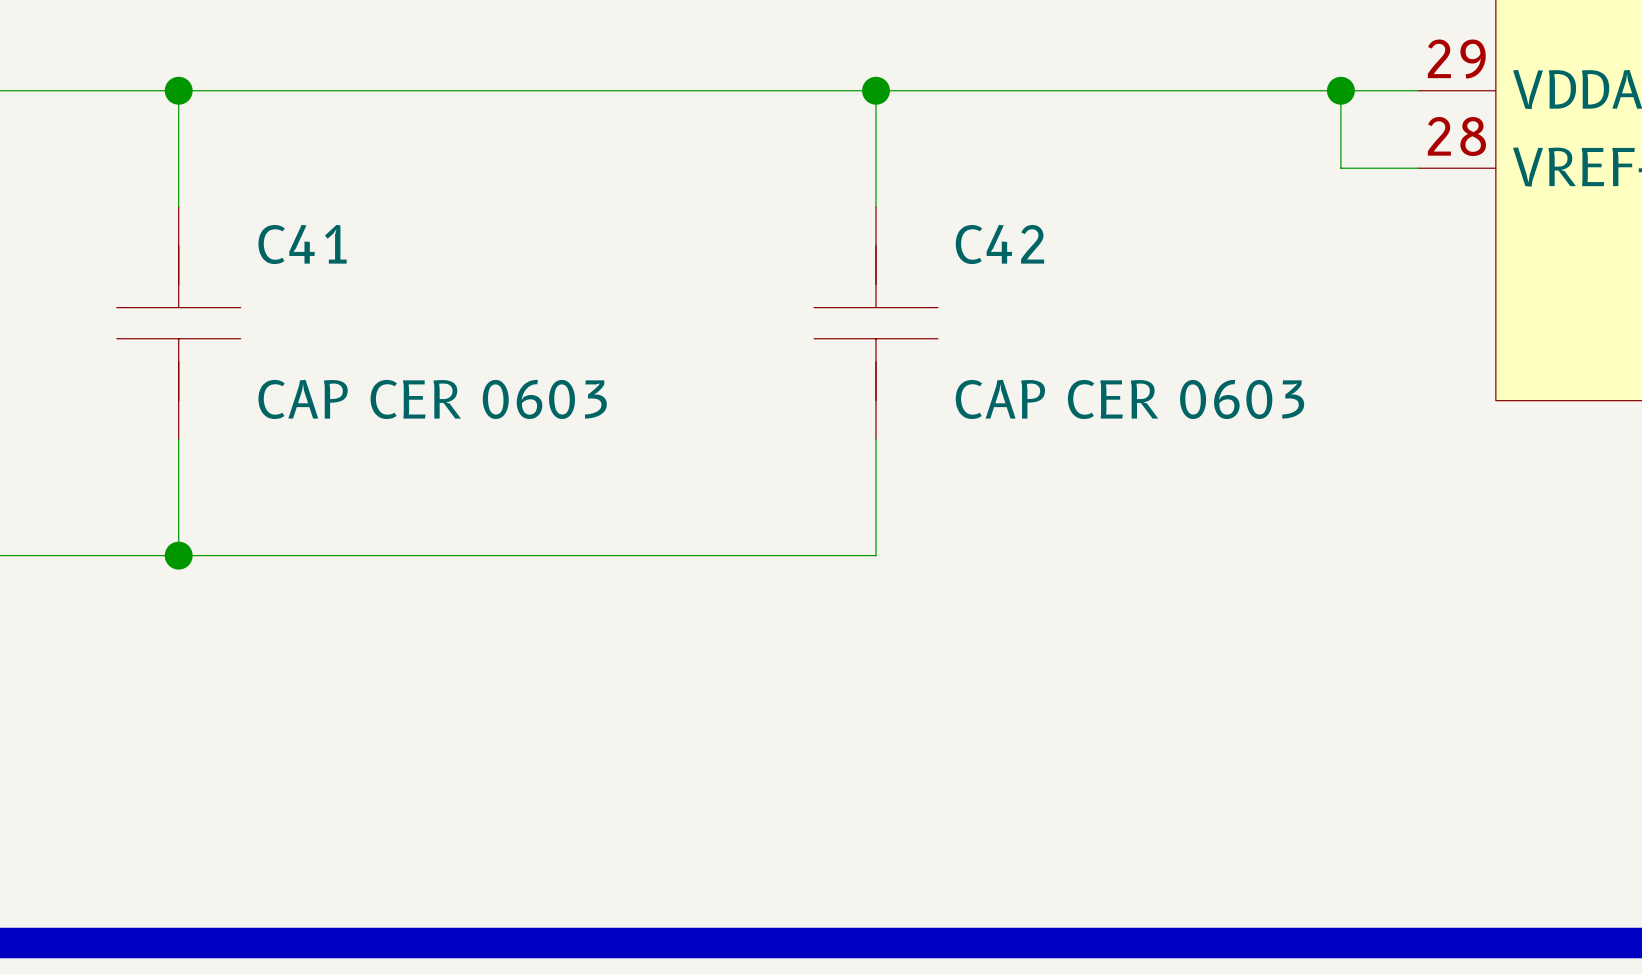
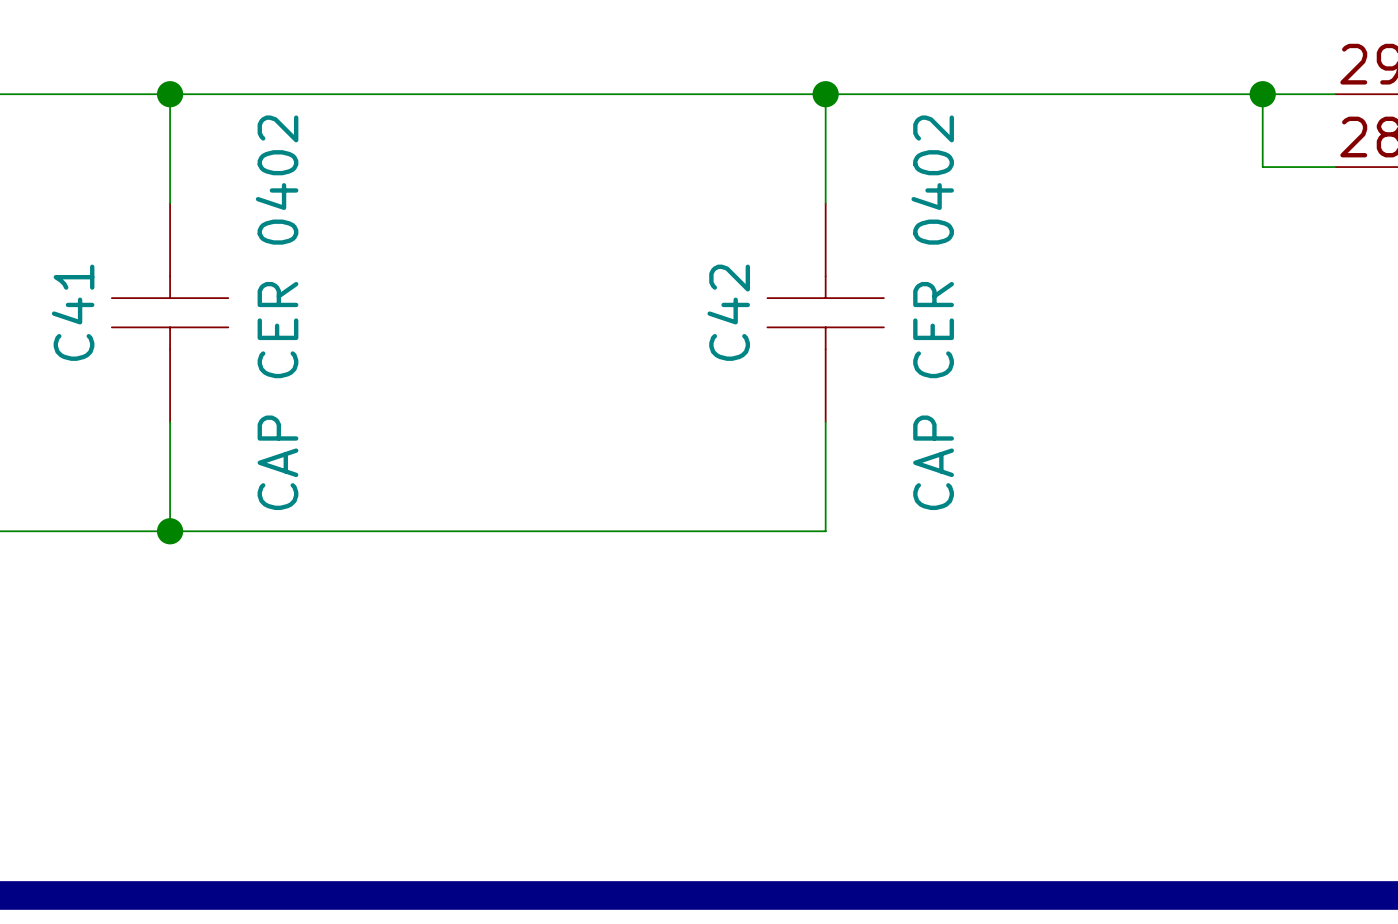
C41 symbol: [116, 206, 241, 440] -> [111, 203, 229, 423]
C42 symbol: [814, 206, 938, 440] -> [767, 203, 884, 423]
C41 name position: C41 (302, 244) -> C41 (73, 312)
C42 name position: C42 (999, 244) -> C42 (728, 312)
C41 value: CAP CER 0603 (432, 399) -> CAP CER 0402 (277, 312)
C42 value: CAP CER 0603 (1129, 399) -> CAP CER 0402 (932, 312)

